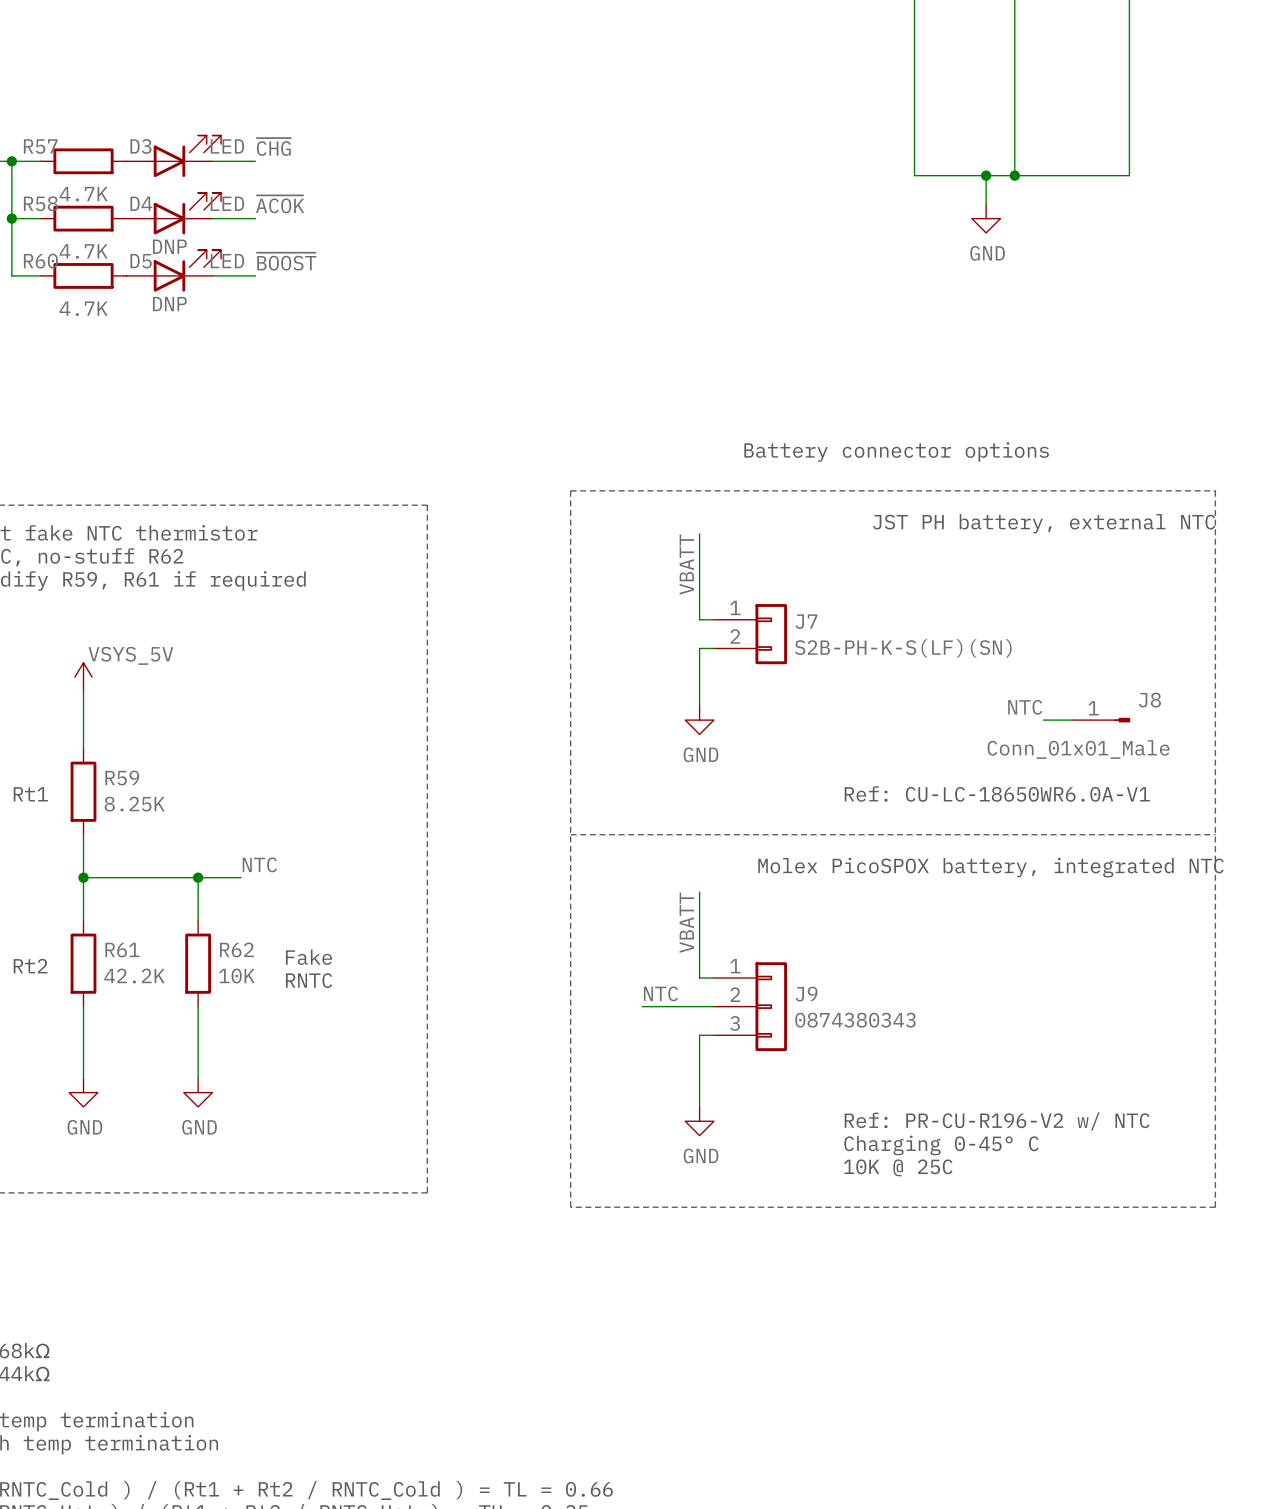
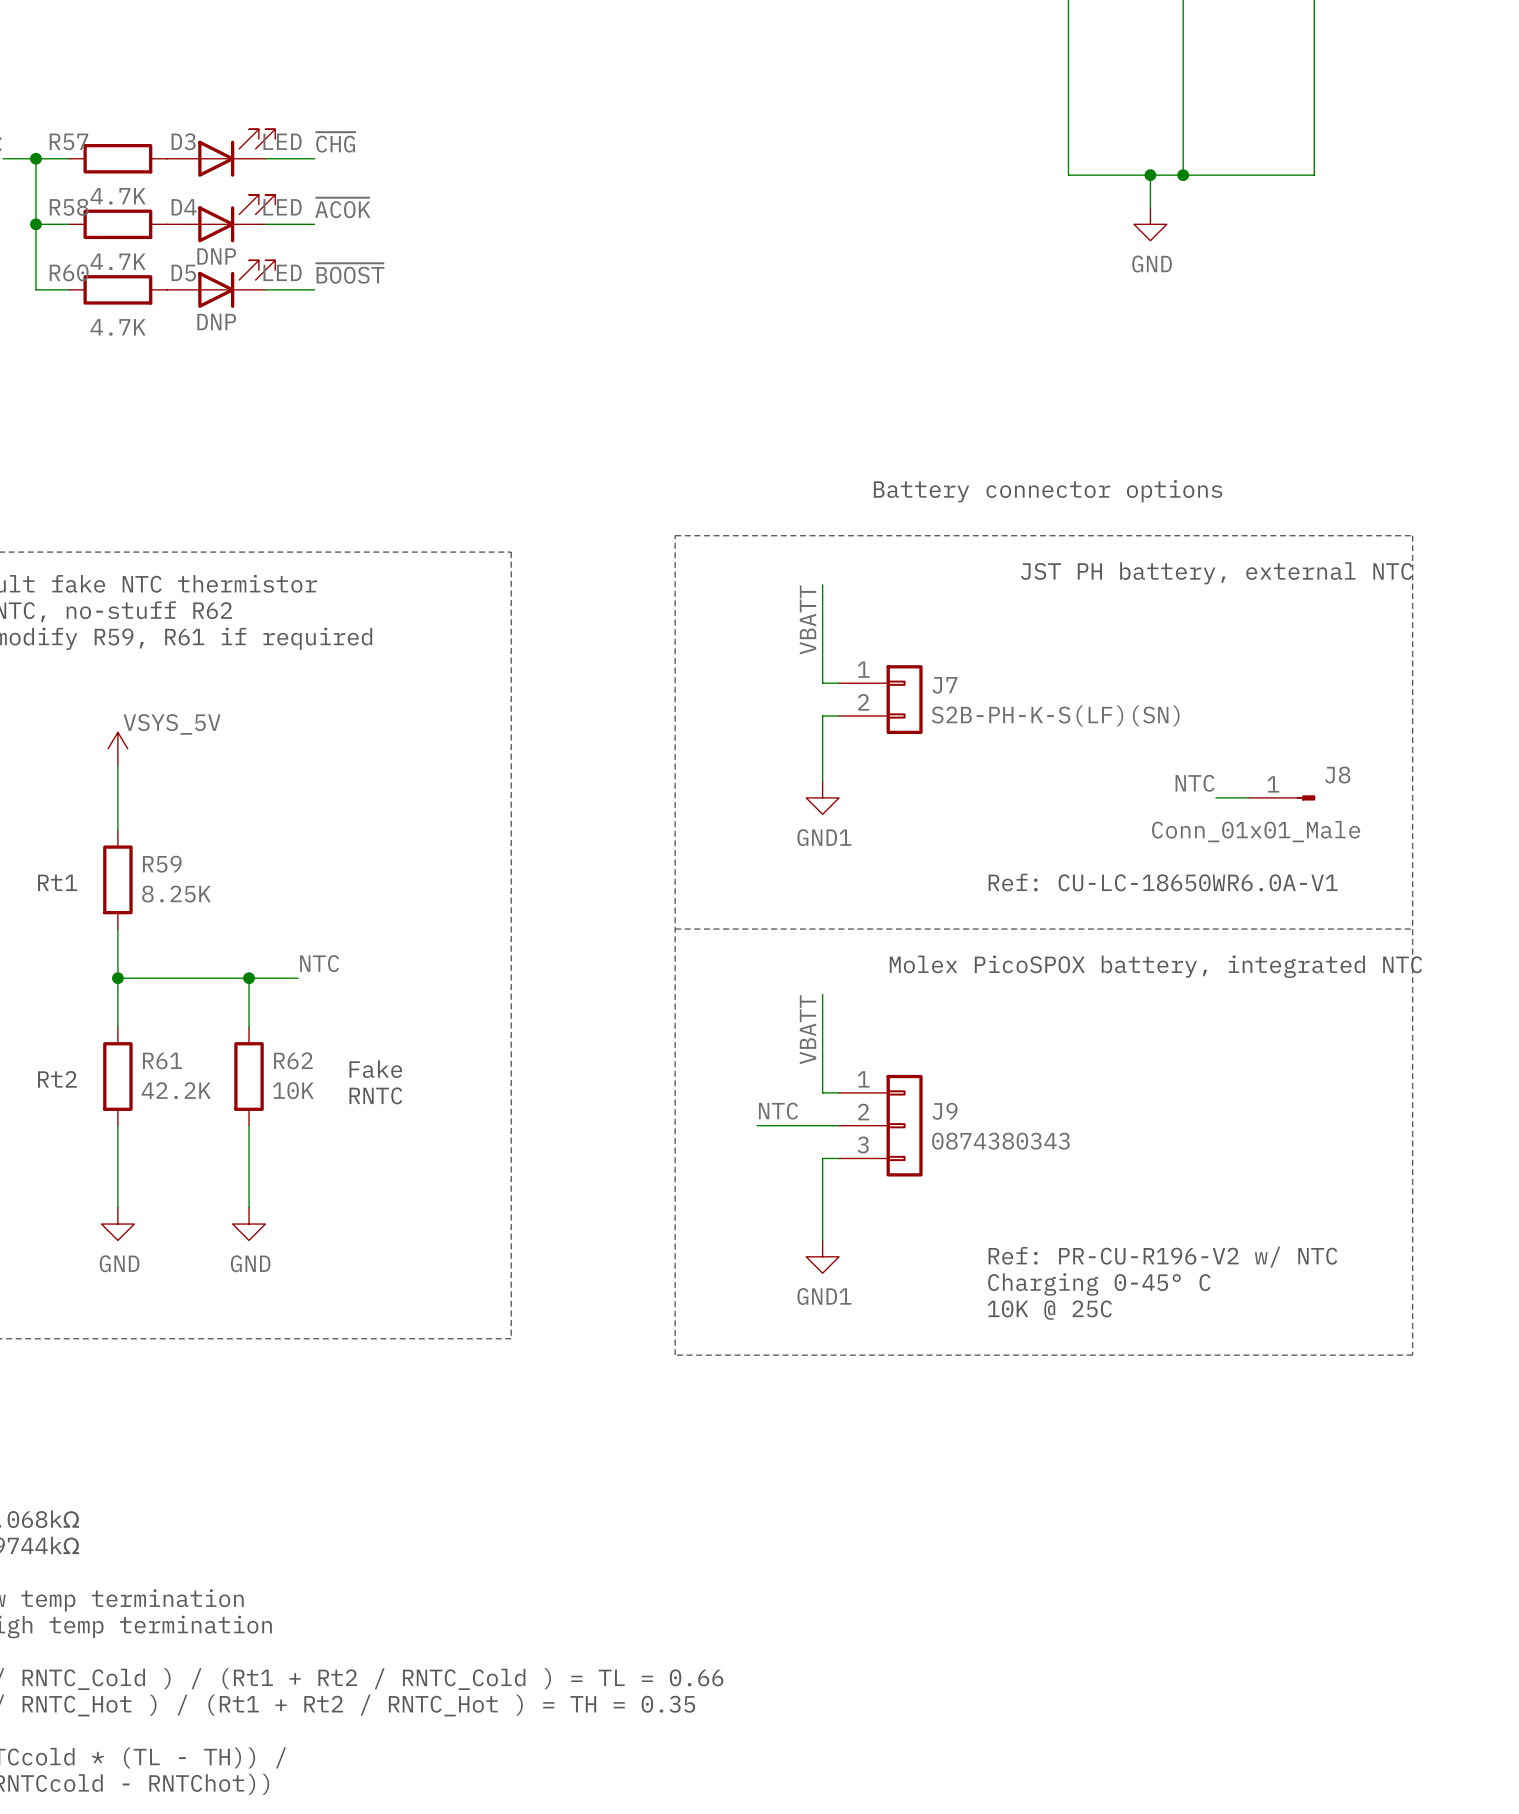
power symbol: GND (699, 720) -> GND1 (822, 797)
power symbol: GND (699, 1121) -> GND1 (822, 1256)

